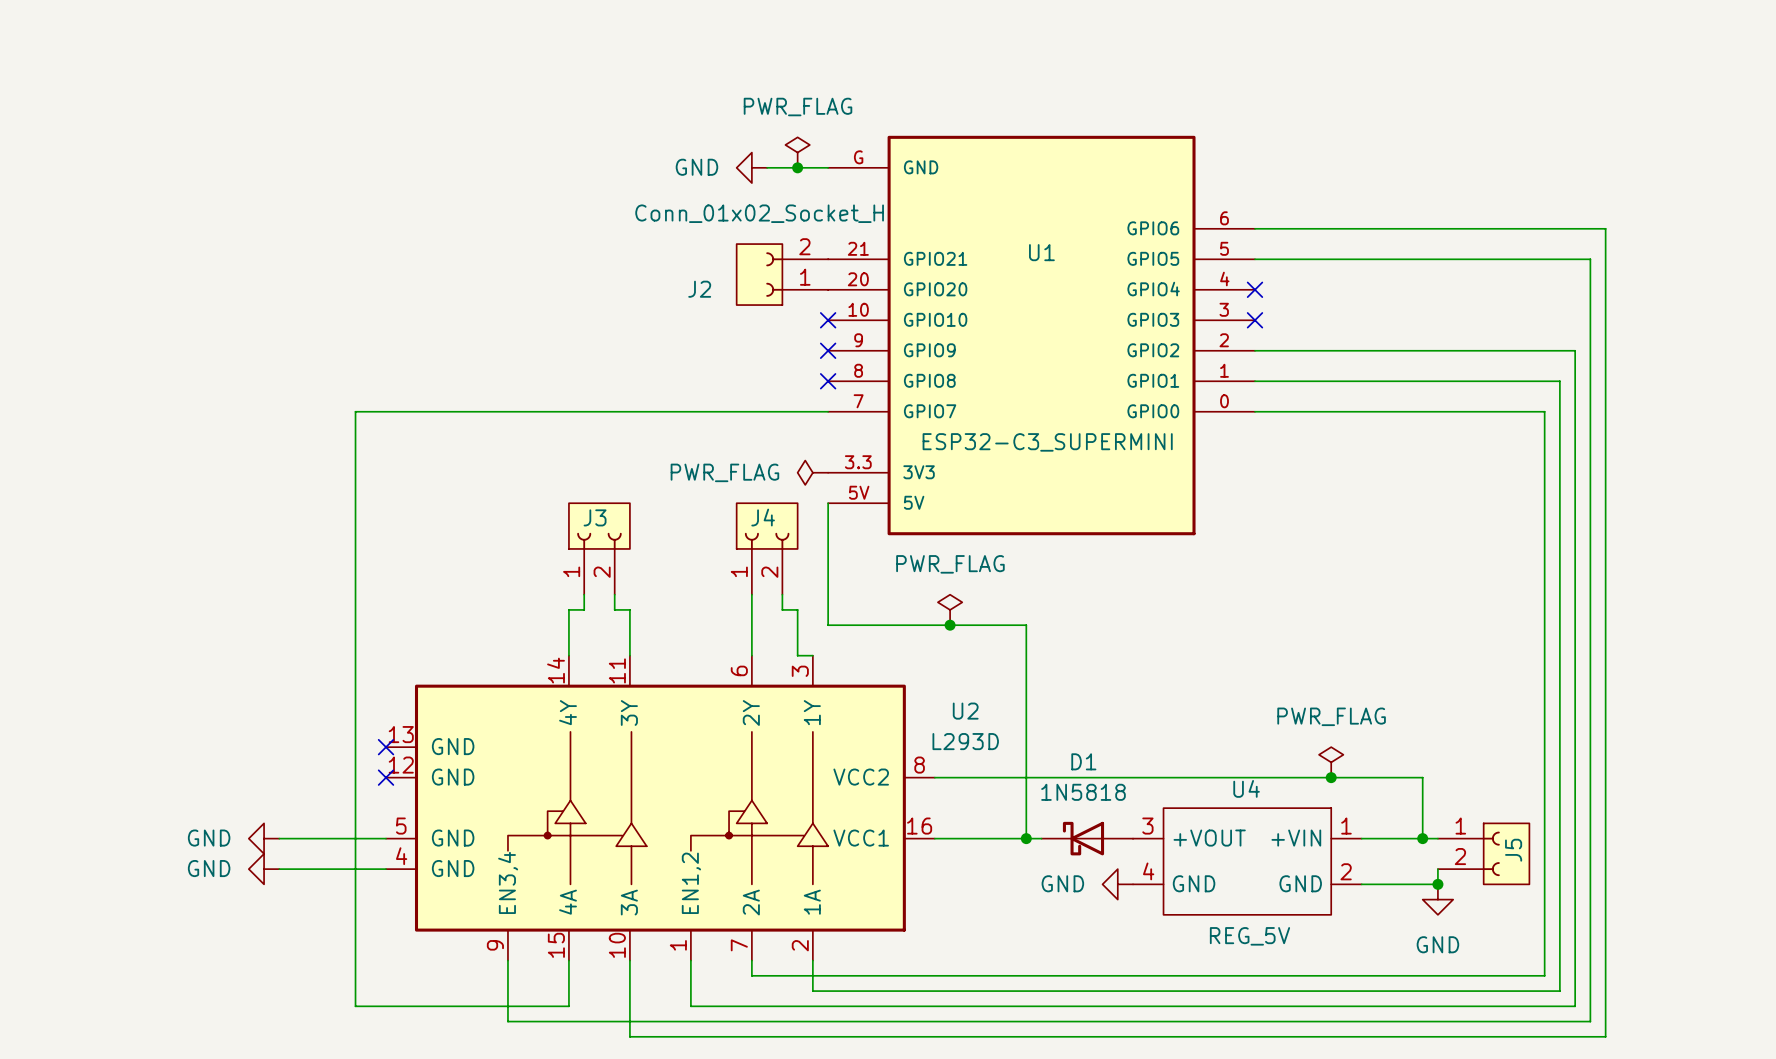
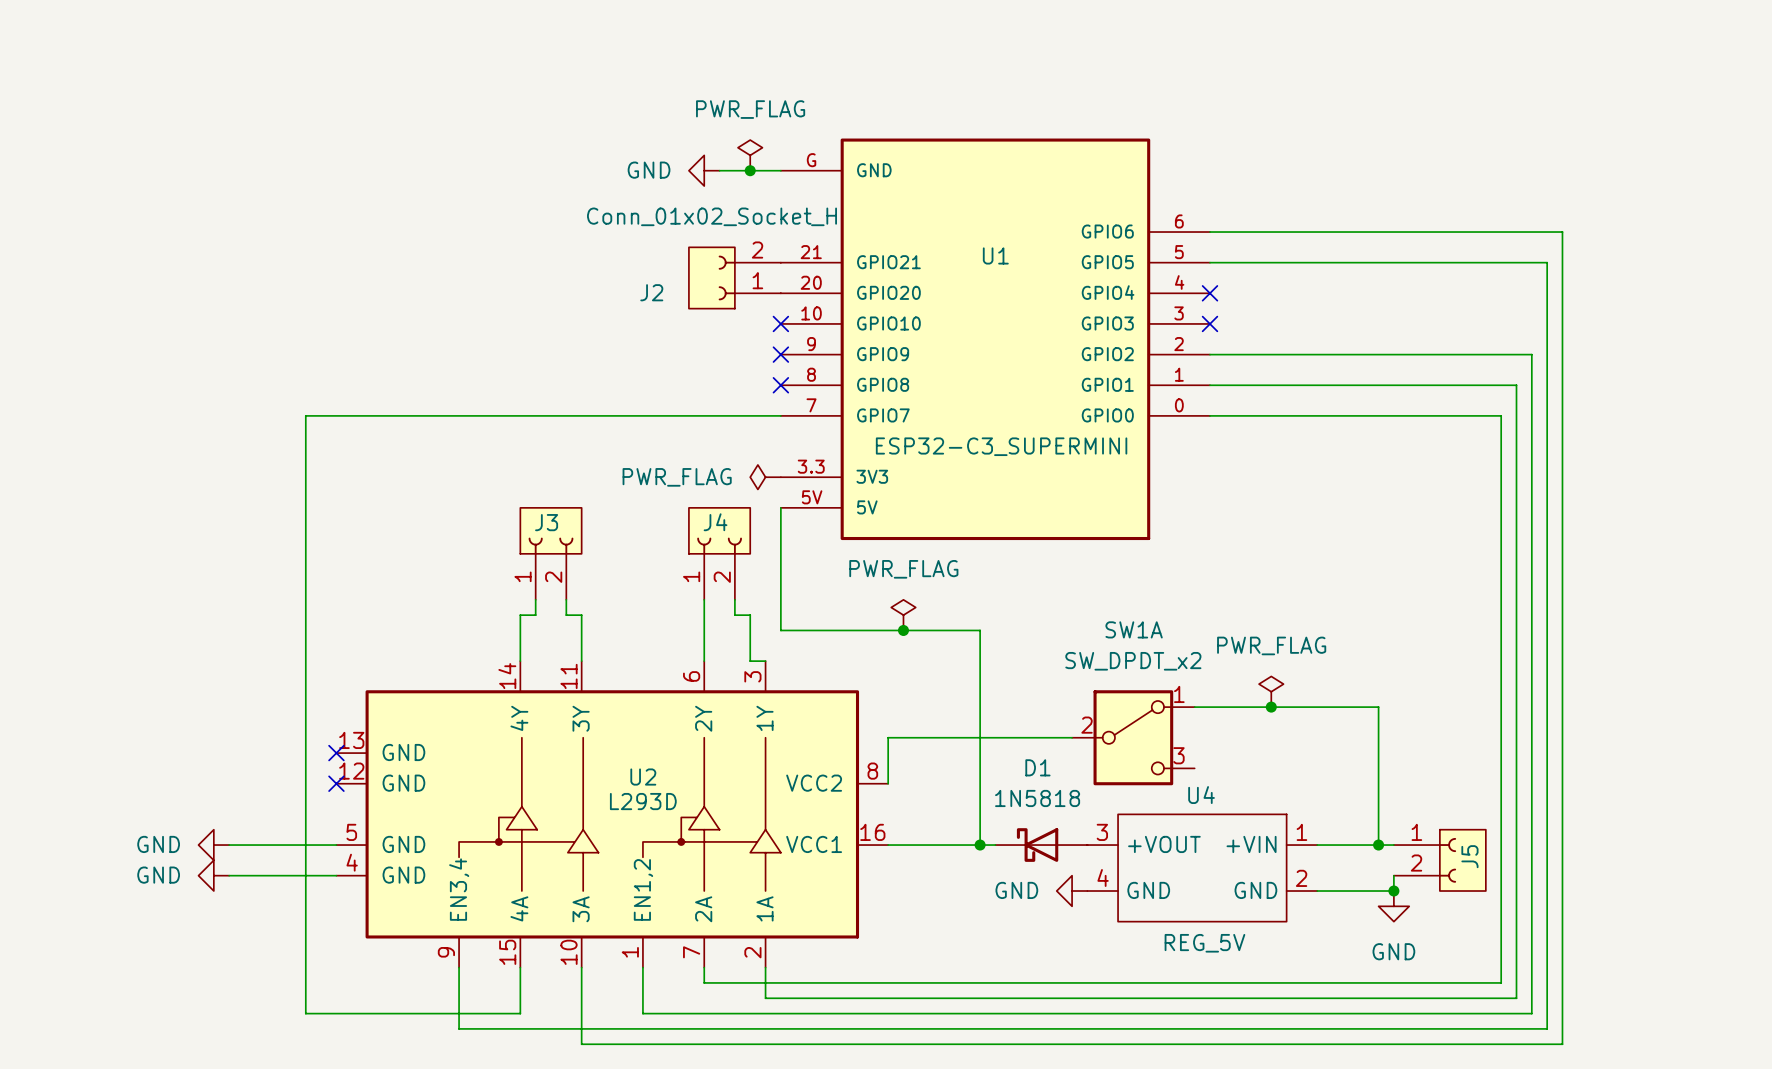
wire: none -> (1194, 707) (1378, 707) (1378, 783)
junction: none -> (1271, 707)
U2 name position: U2 (965, 711) -> U2 (643, 777)
SW1A: none -> SW_DPDT_x2 (1133, 737)
U2 value position: L293D (965, 741) -> L293D (643, 801)
power symbol position: PWR_FLAG (1331, 762) -> PWR_FLAG (1271, 691)
wire: (934, 777) (1422, 777) -> (888, 783) (888, 737) (1072, 737)
junction: (1331, 777) -> none

